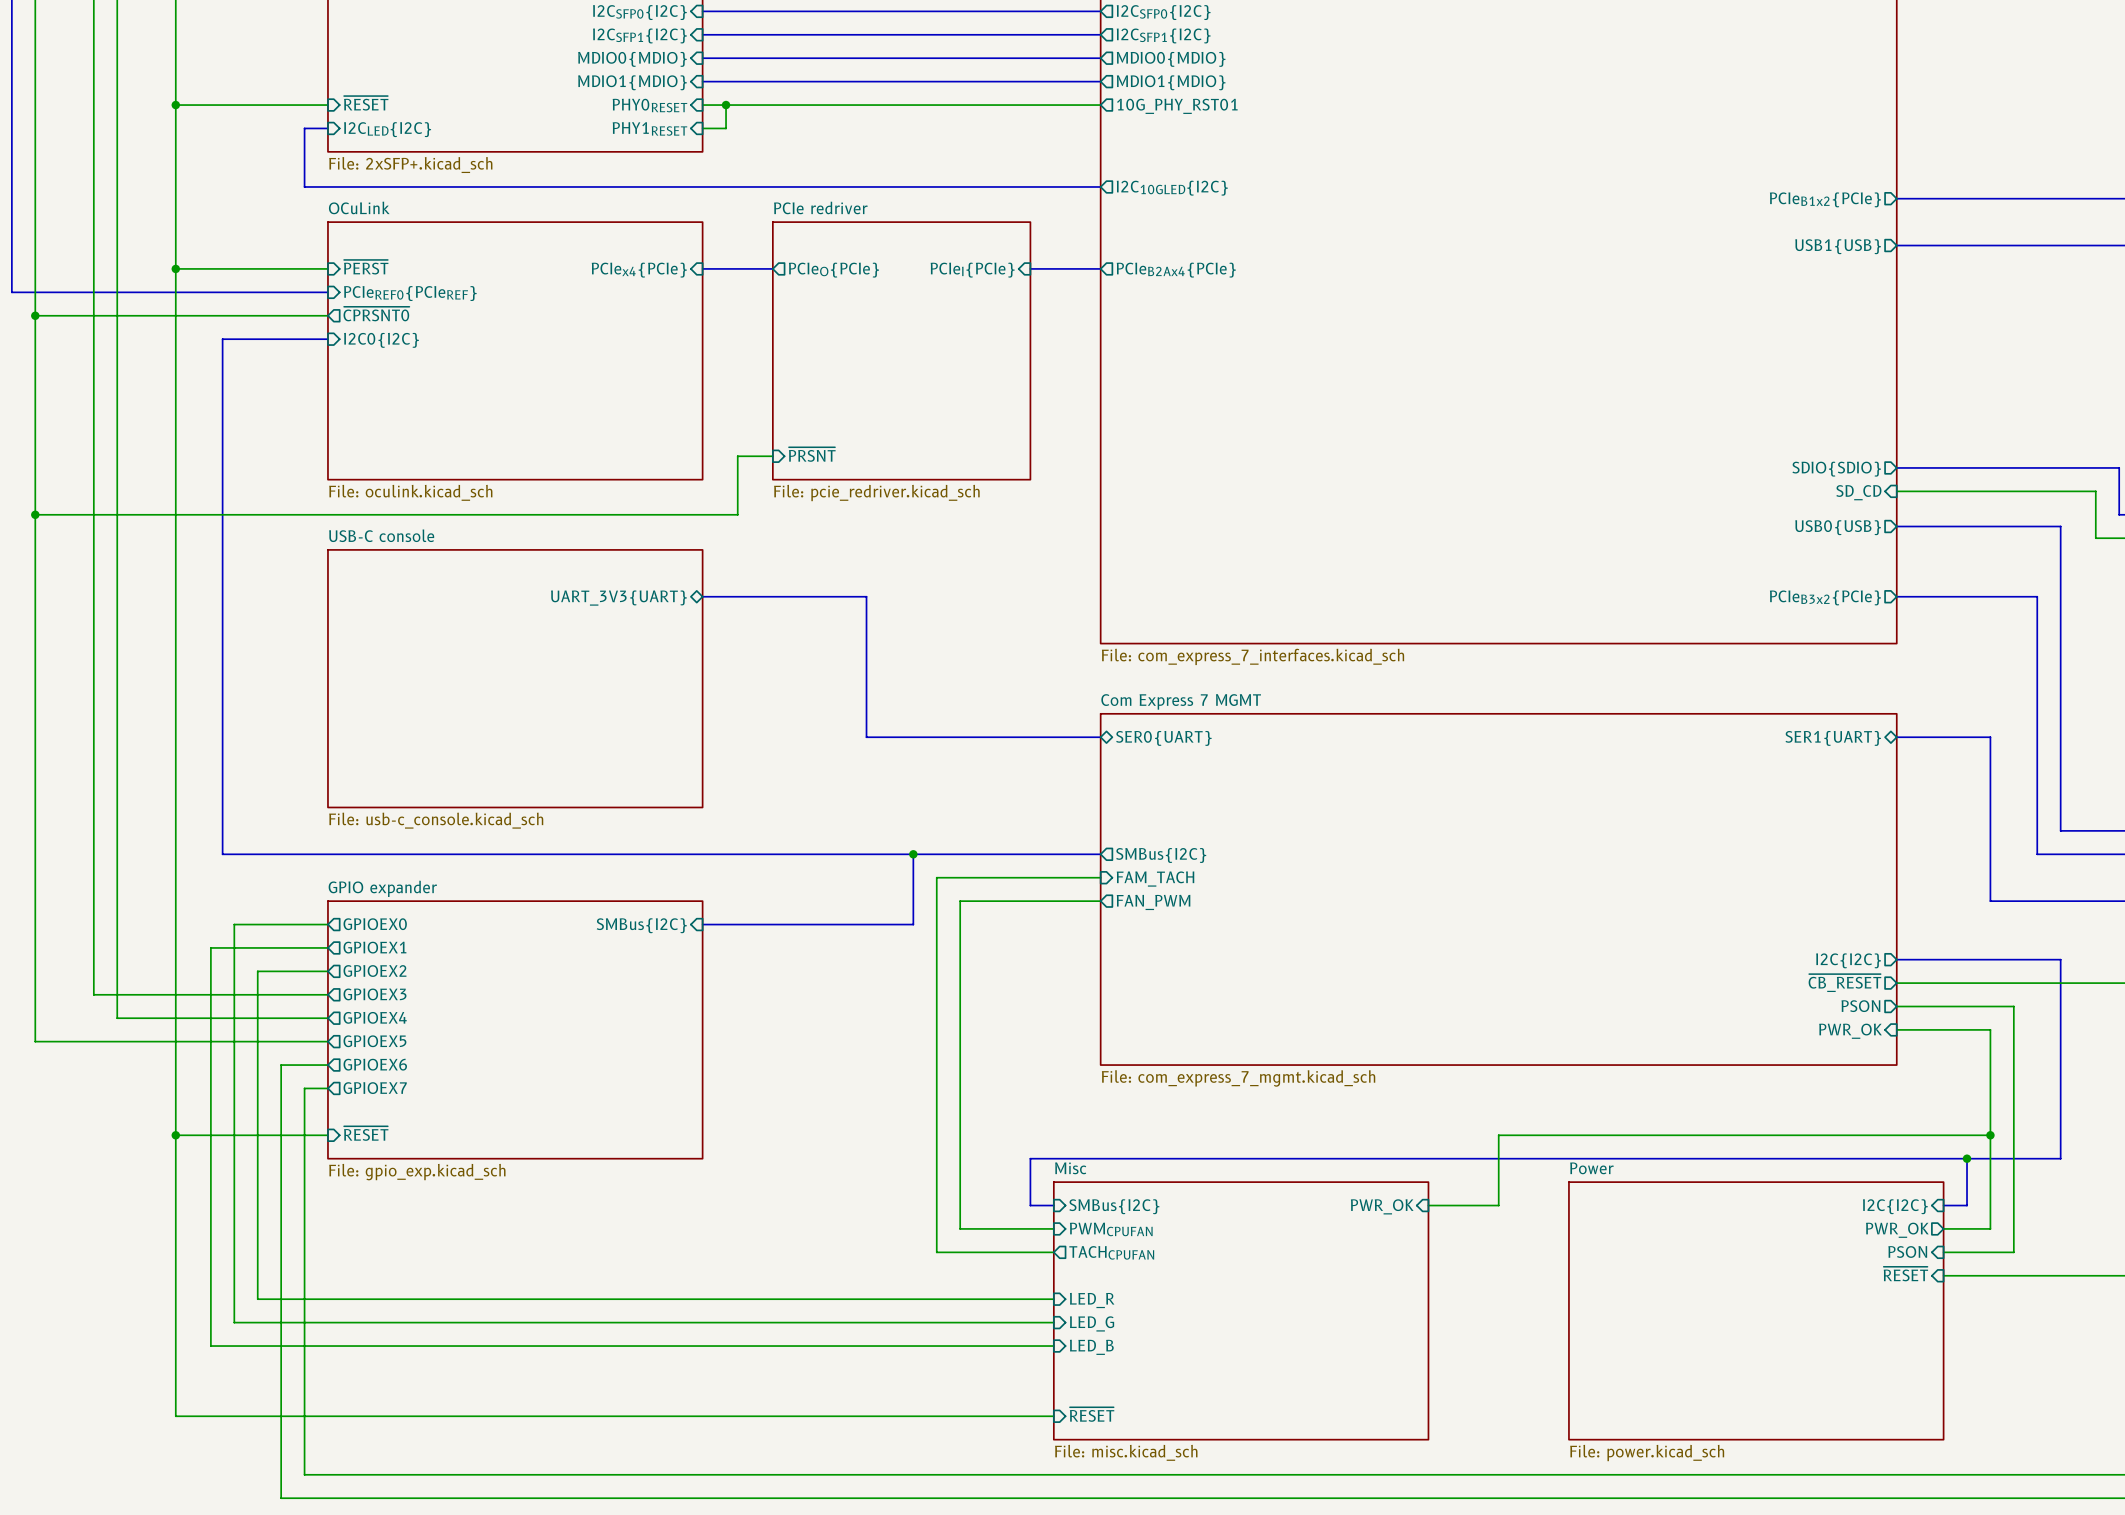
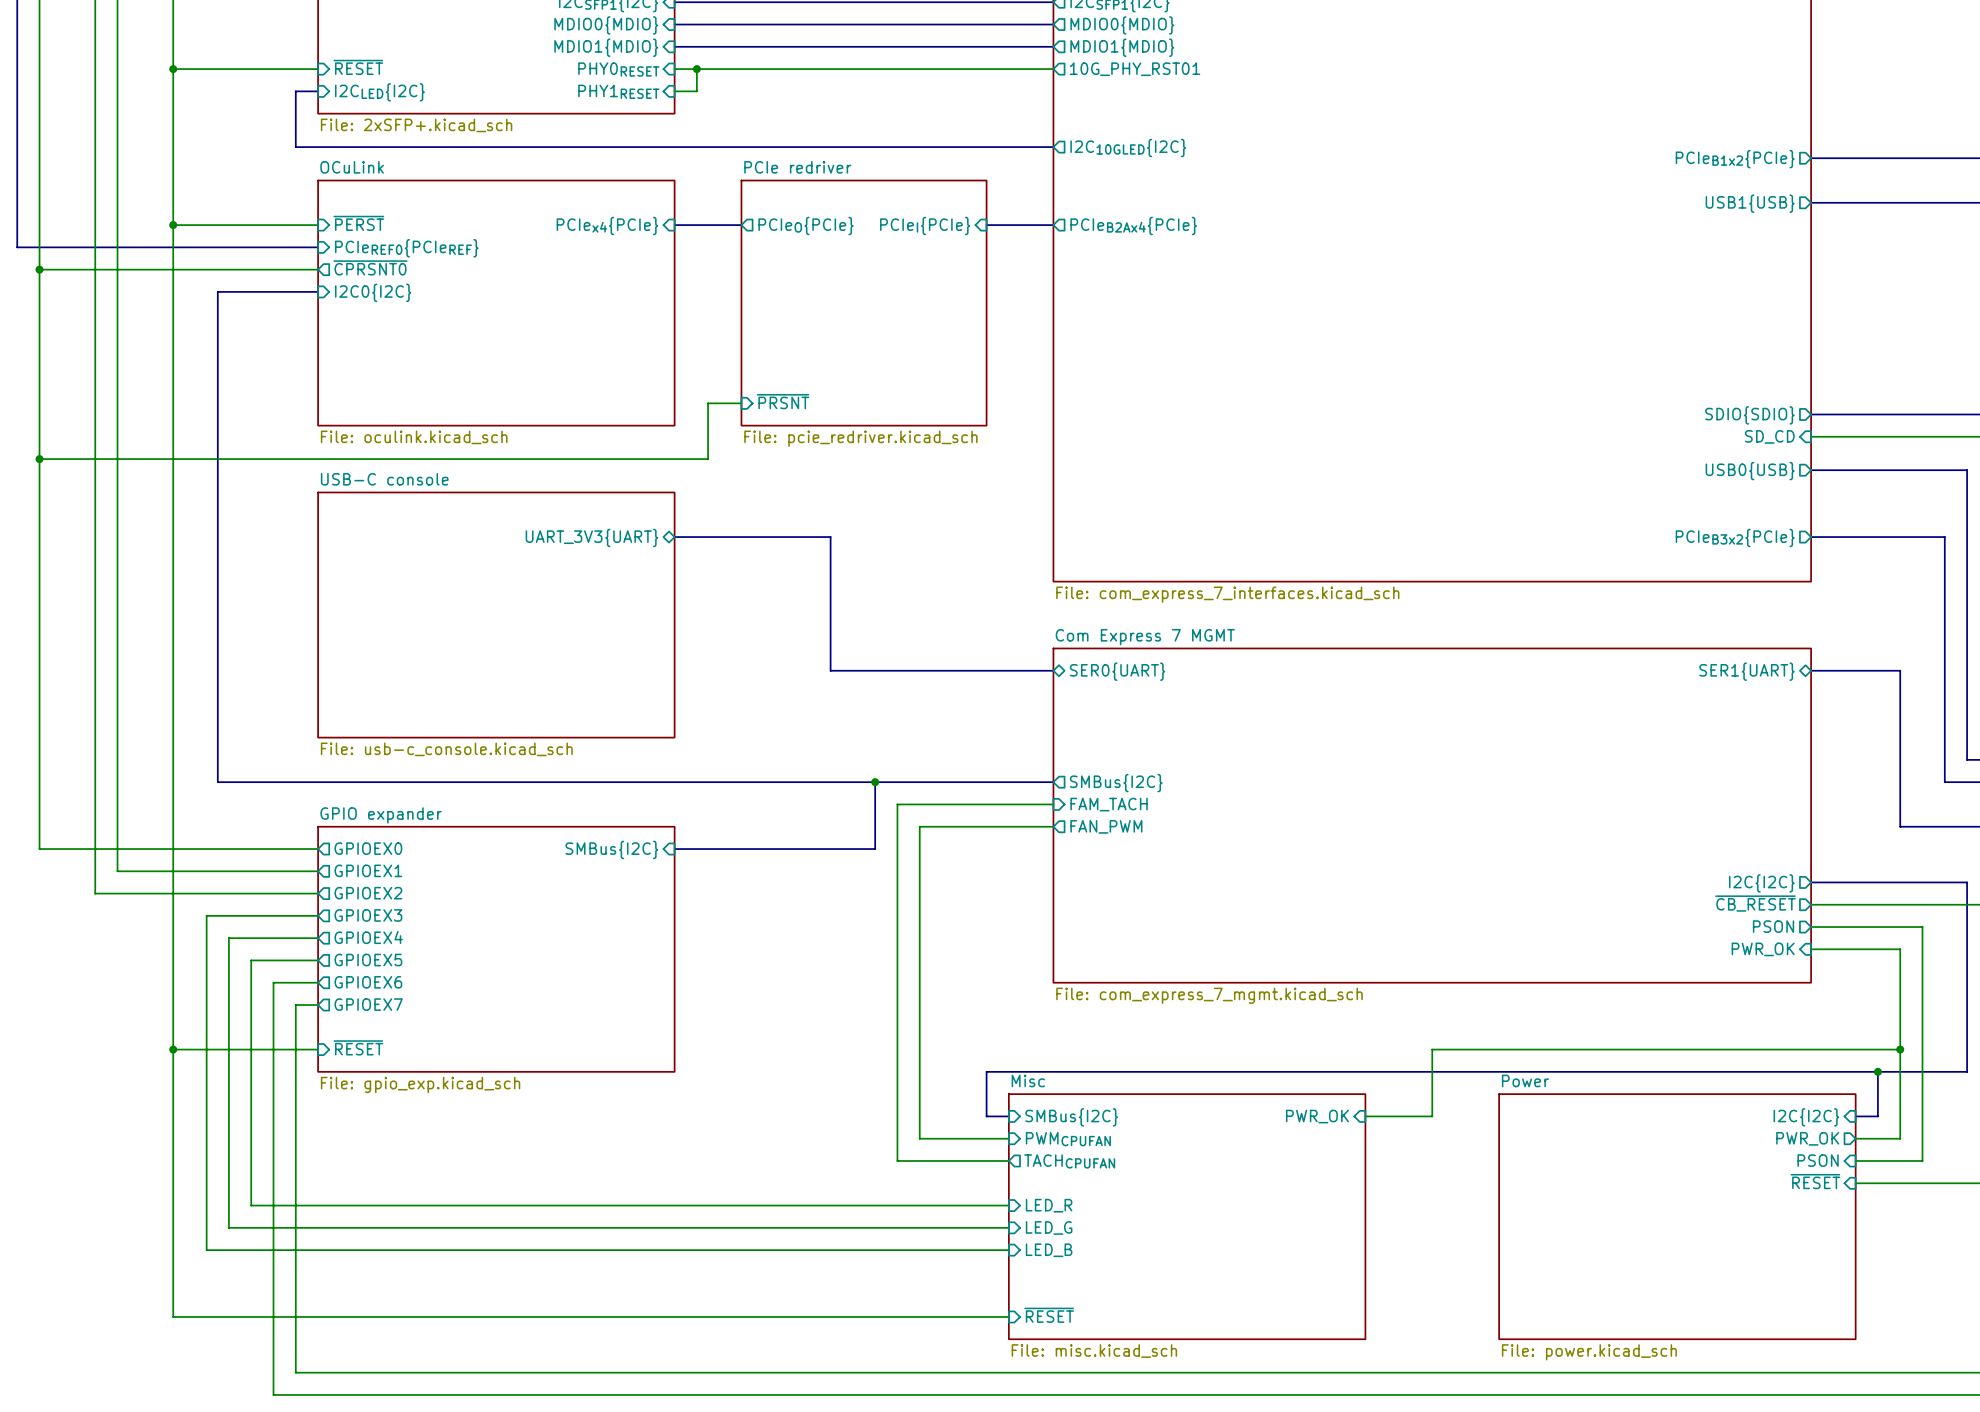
wire: (35, 924) (35, 1041) (257, 1041) (257, 971) -> (39, 849) (228, 849)
wire: (234, 924) (234, 1018) (117, 1018) (117, 947) -> (206, 871) (117, 871)
wire: (210, 947) (210, 994) (93, 994) (93, 971) -> (251, 893) (95, 893)

